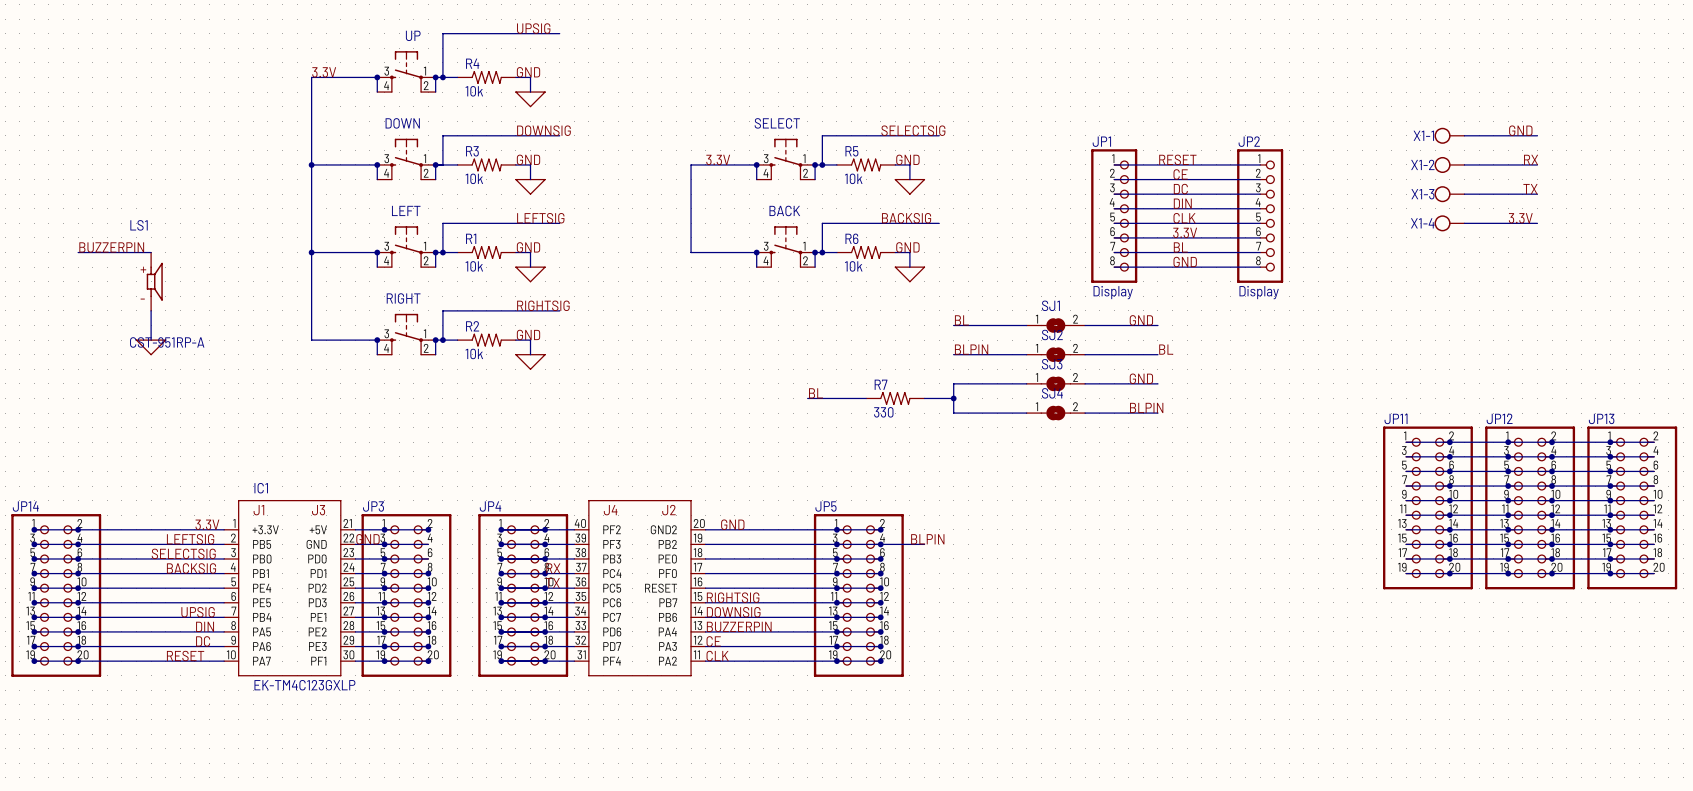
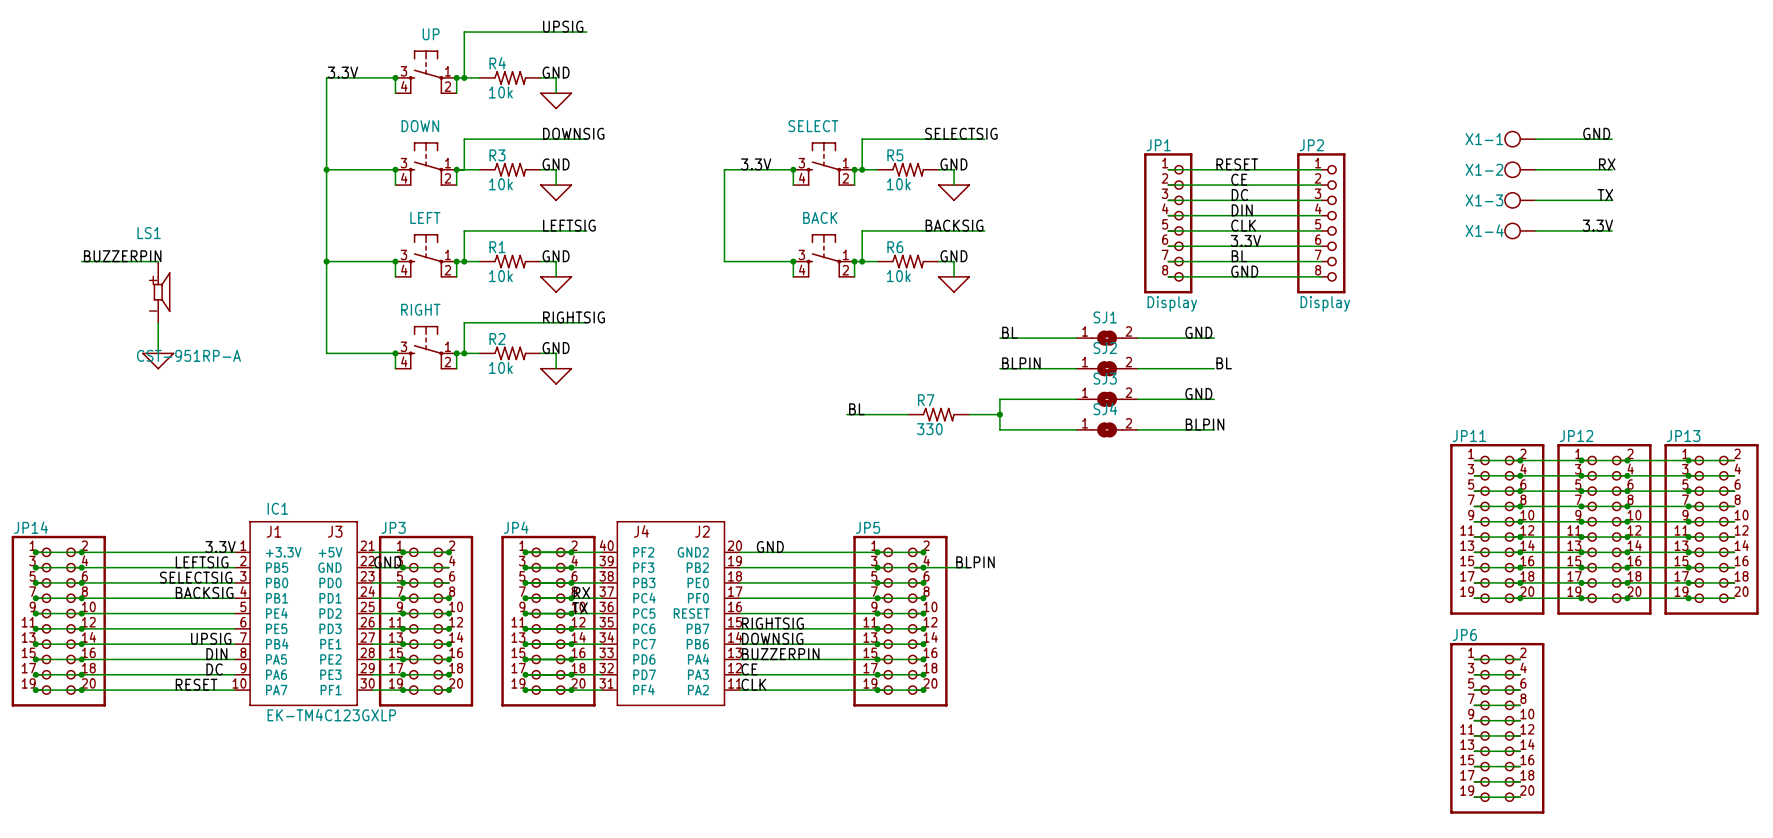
wire: none -> (1474, 659) (1520, 659)
wire: none -> (1474, 674) (1520, 674)
wire: none -> (1474, 690) (1520, 690)
wire: none -> (1474, 705) (1520, 705)
wire: none -> (1474, 720) (1520, 720)
JP6: none -> (1497, 728)
wire: none -> (1474, 735) (1520, 735)
wire: none -> (1474, 751) (1520, 751)
wire: none -> (1474, 766) (1520, 766)
wire: none -> (1474, 781) (1520, 781)
wire: none -> (1474, 797) (1520, 797)

